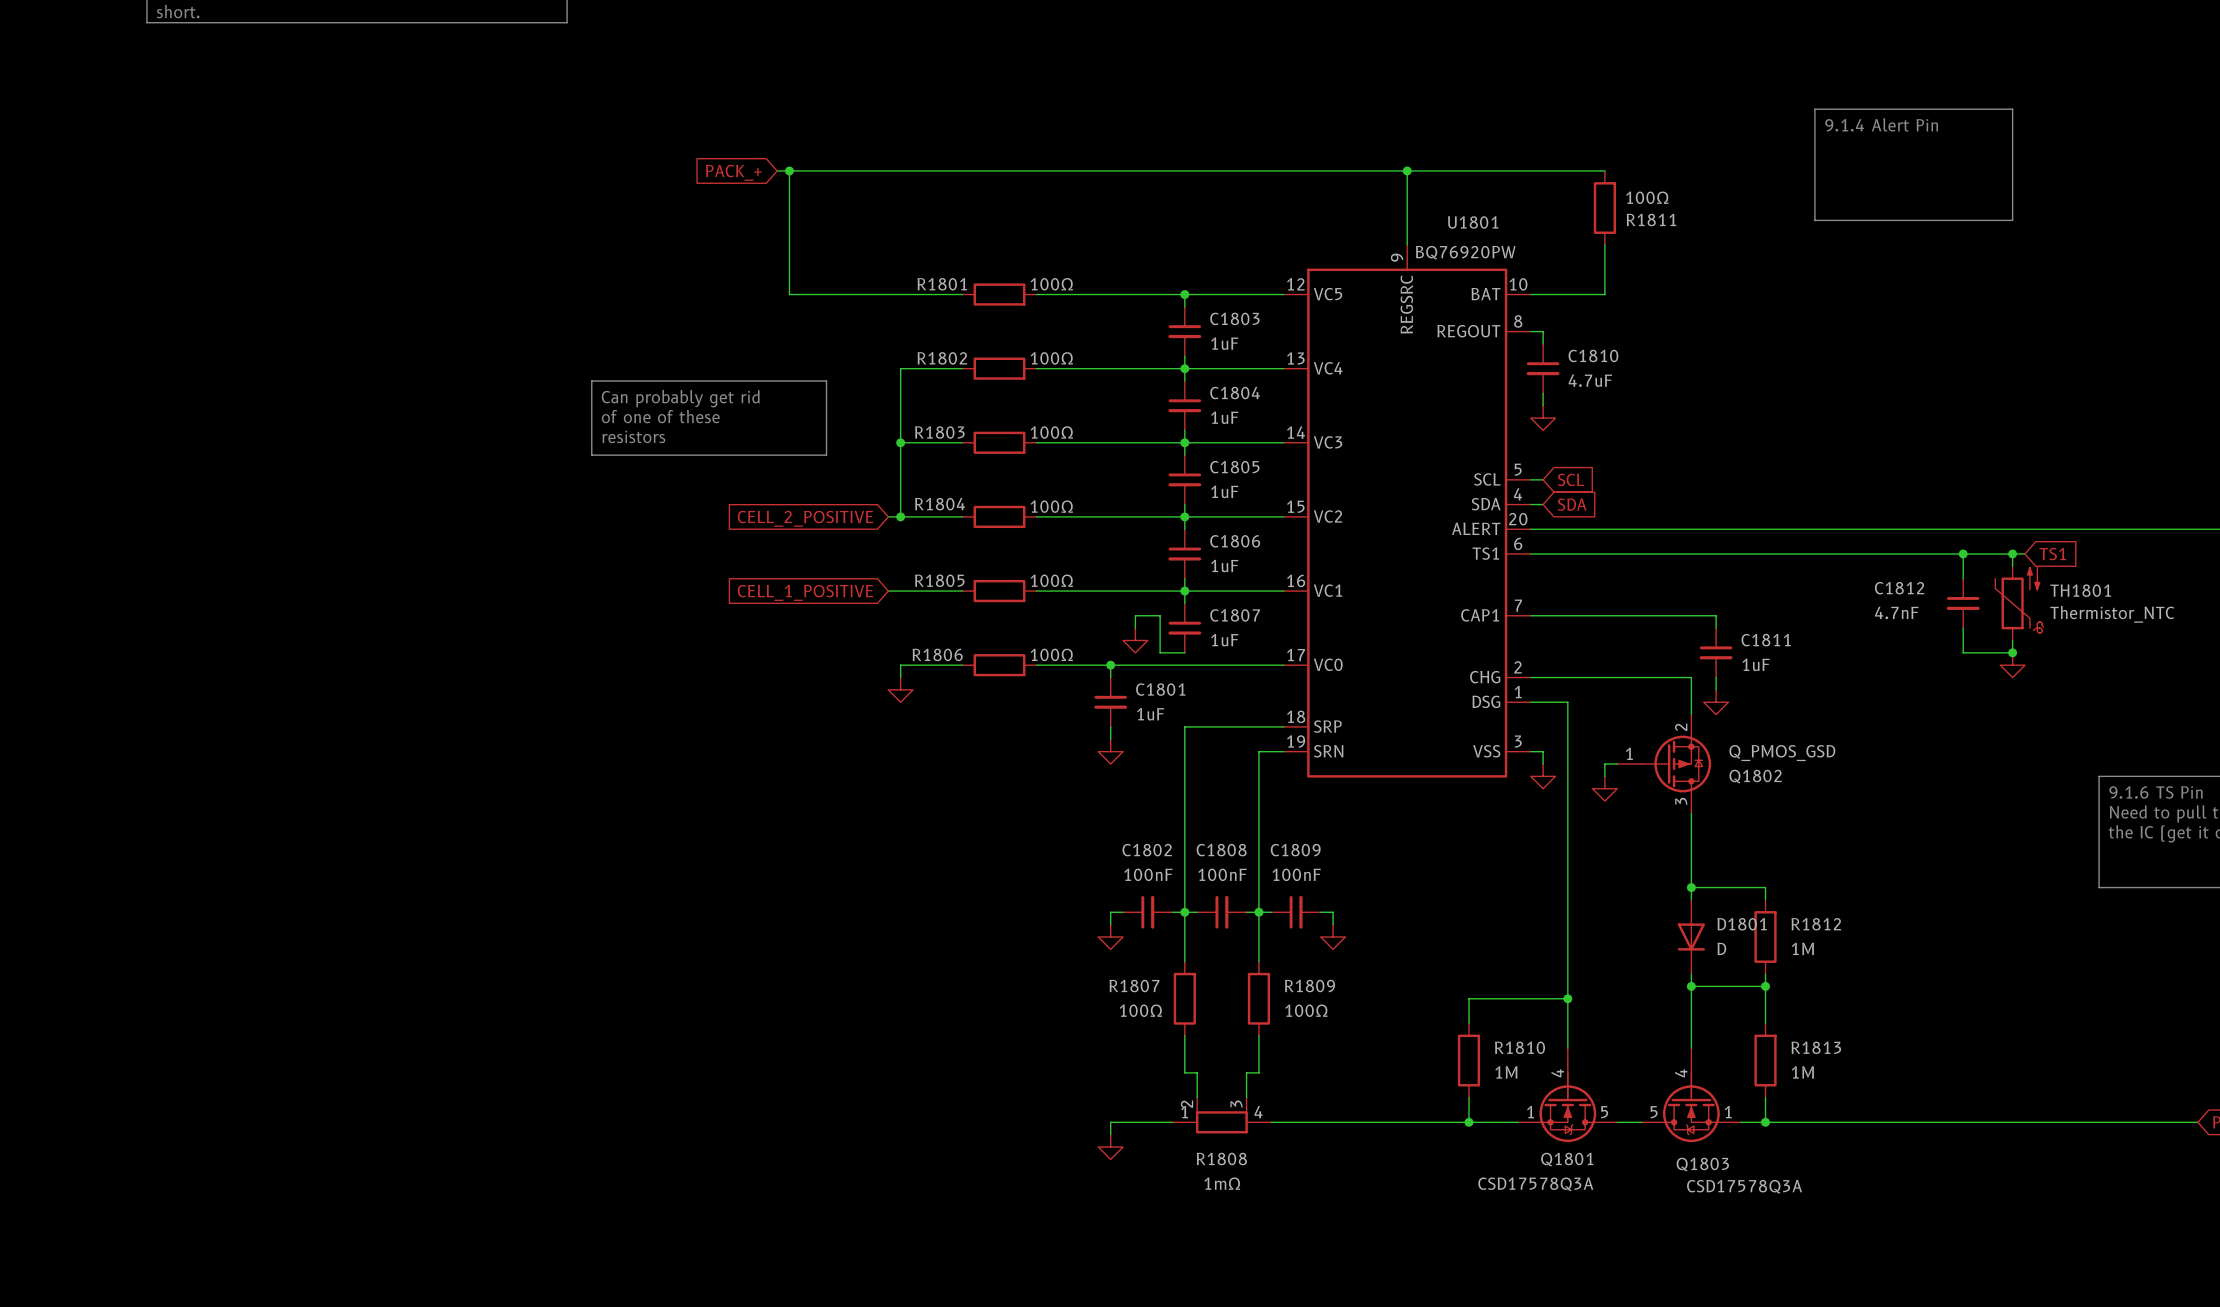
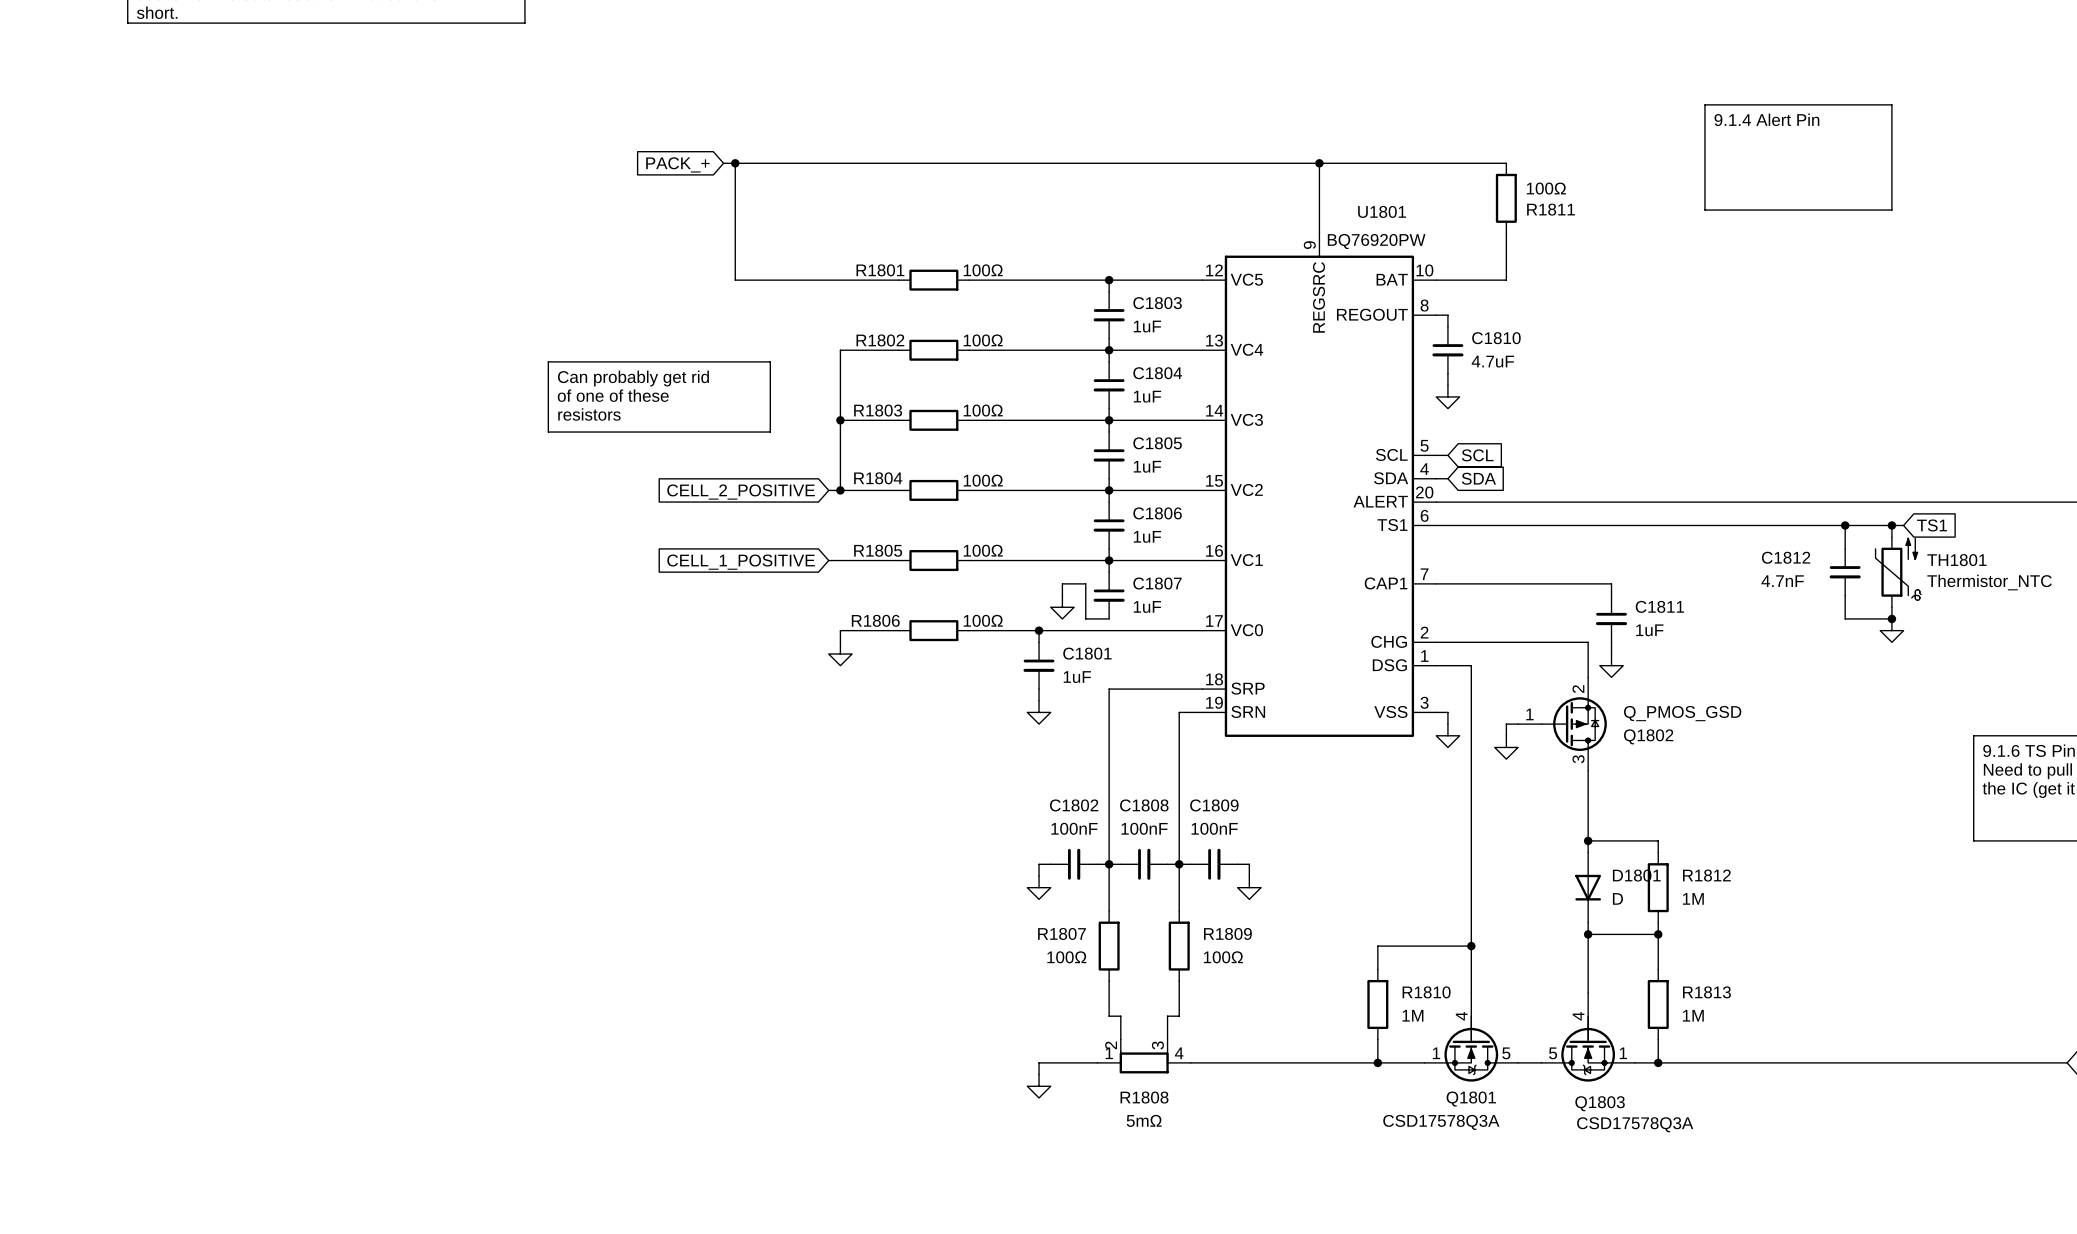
R1808 value: 1mΩ (1222, 1183) -> 5mΩ (1144, 1120)

